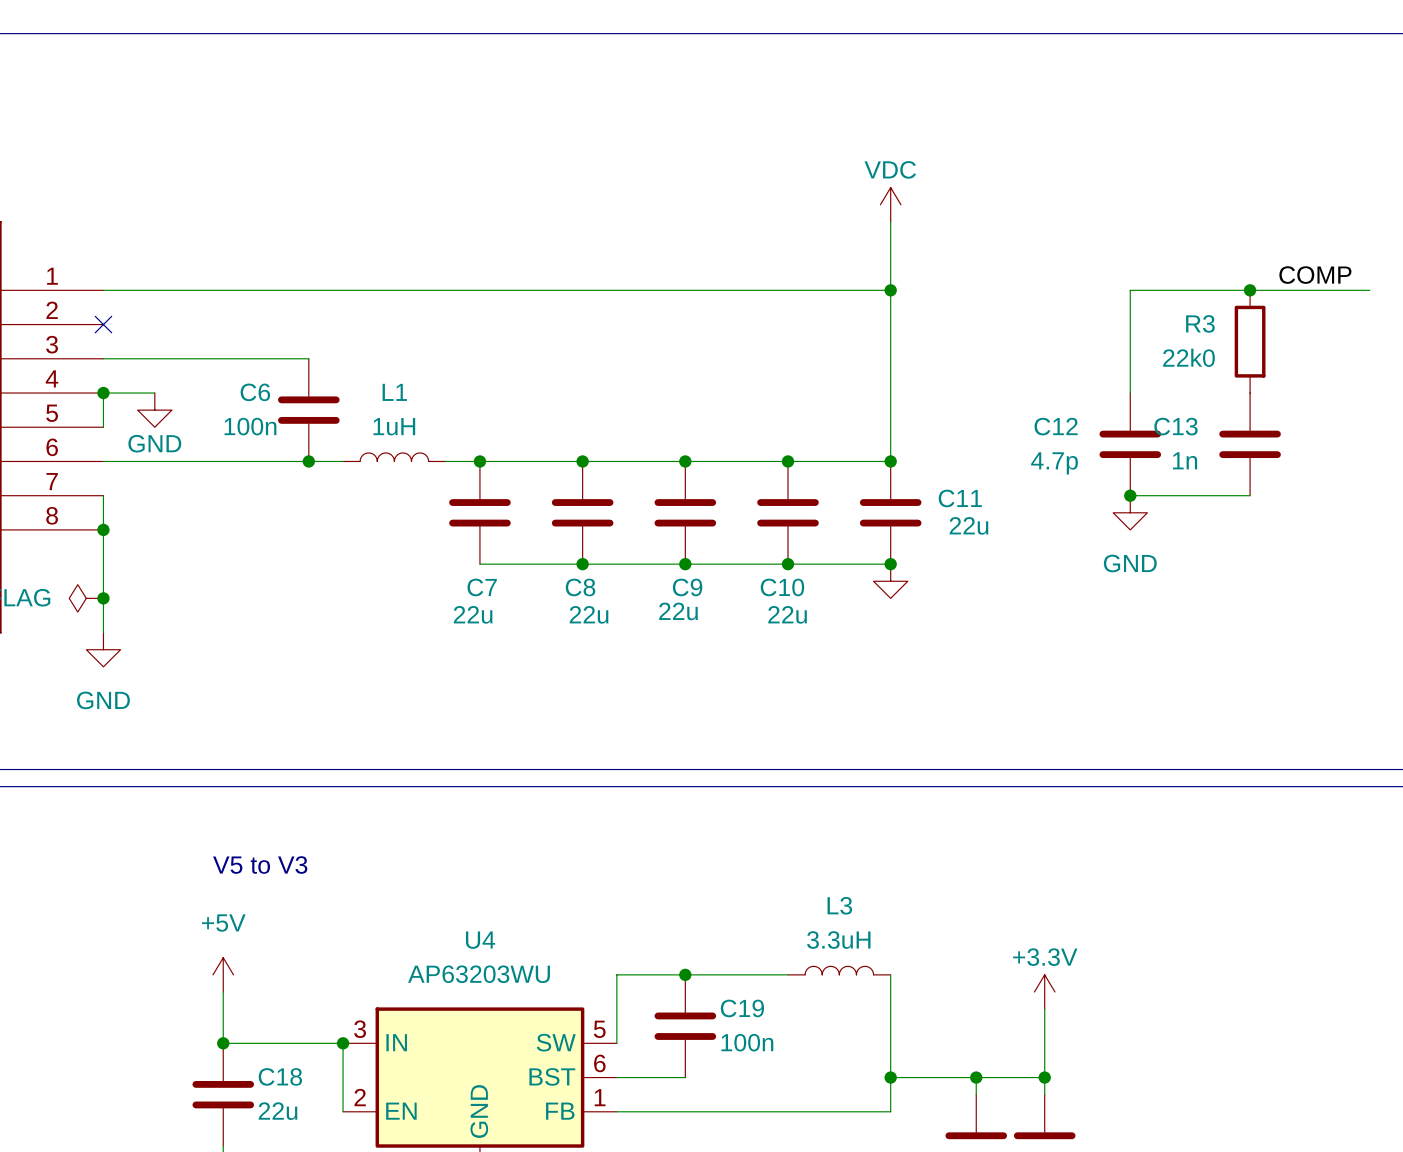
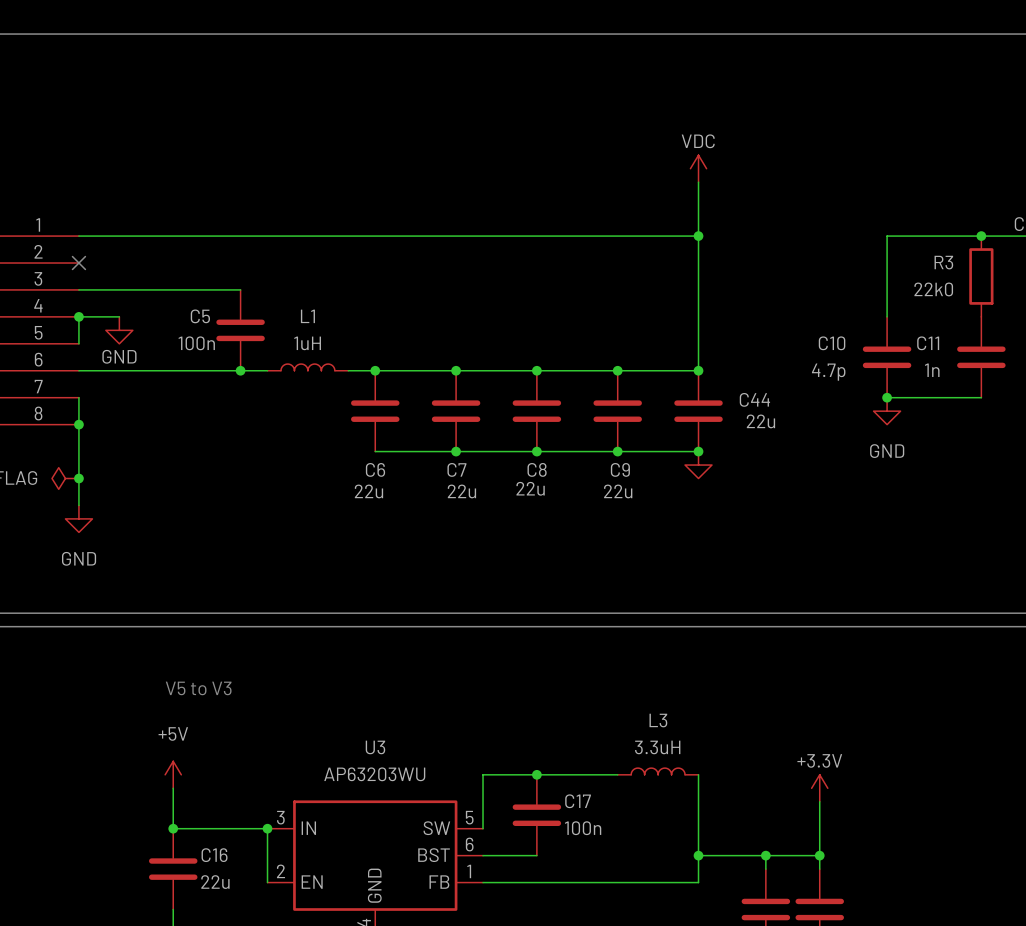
C6 name: C6 (255, 392) -> C5 (200, 316)
C12 name: C12 (1056, 426) -> C10 (832, 343)
C13 name: C13 (1176, 426) -> C11 (928, 343)
C11 name: C11 (960, 498) -> C44 (754, 399)
C7 name: C7 (482, 587) -> C6 (375, 469)
C8 name: C8 (580, 587) -> C7 (456, 469)
C9 name: C9 (687, 587) -> C8 (537, 469)
C10 name: C10 (782, 587) -> C9 (620, 469)
U4 name: U4 (480, 940) -> U3 (375, 747)
C19 name: C19 (742, 1008) -> C17 (578, 801)
C18 name: C18 (280, 1076) -> C16 (214, 855)

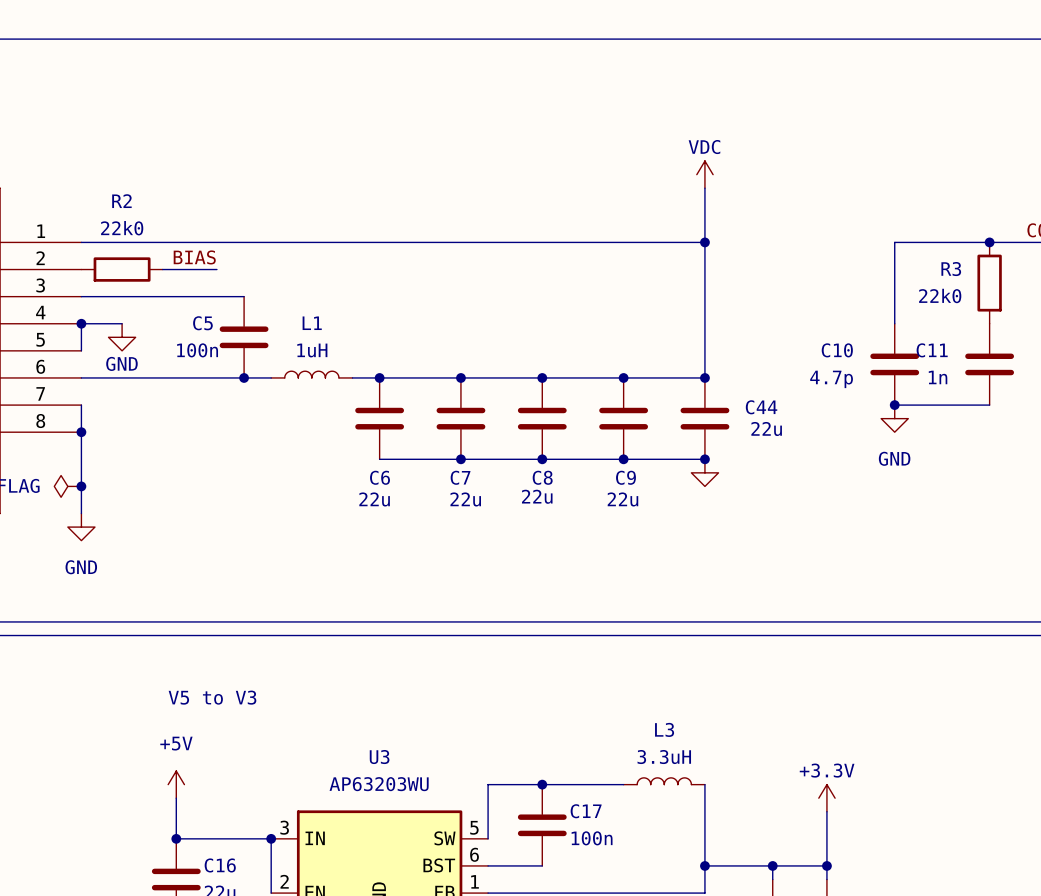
label: none -> BIAS (194, 257)
no-connect mark: (78, 263) -> none
R2: none -> 22k0 (122, 269)
wire: none -> (162, 269) (216, 269)

